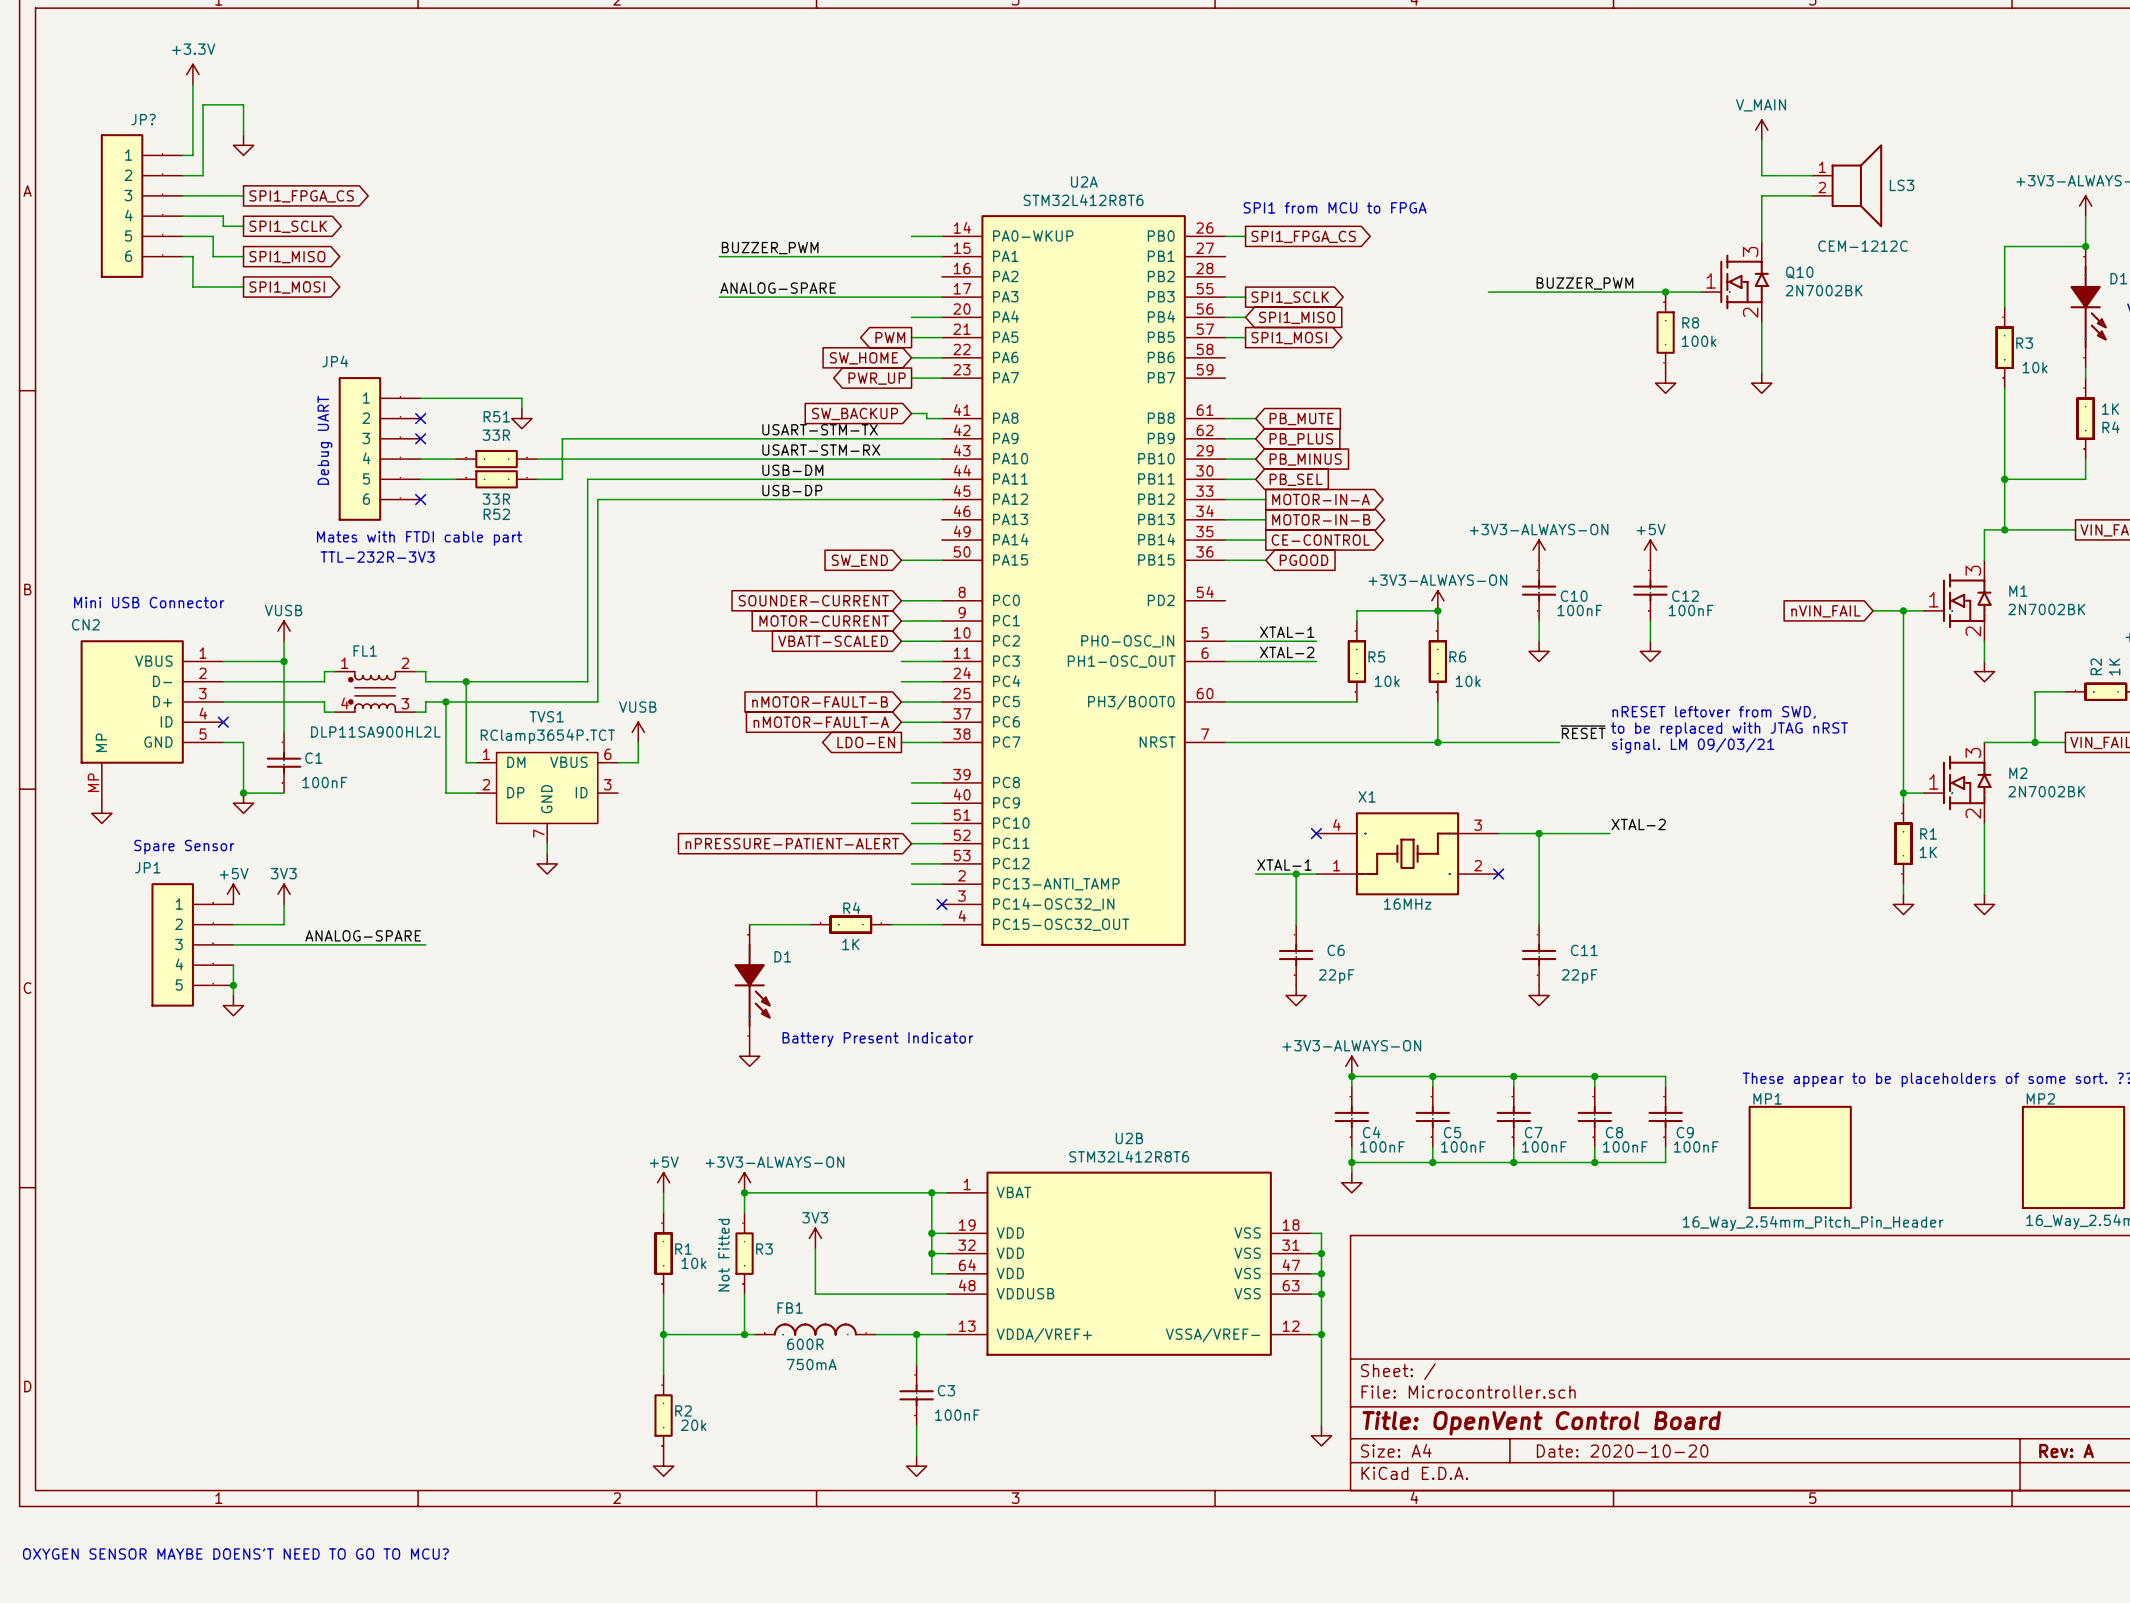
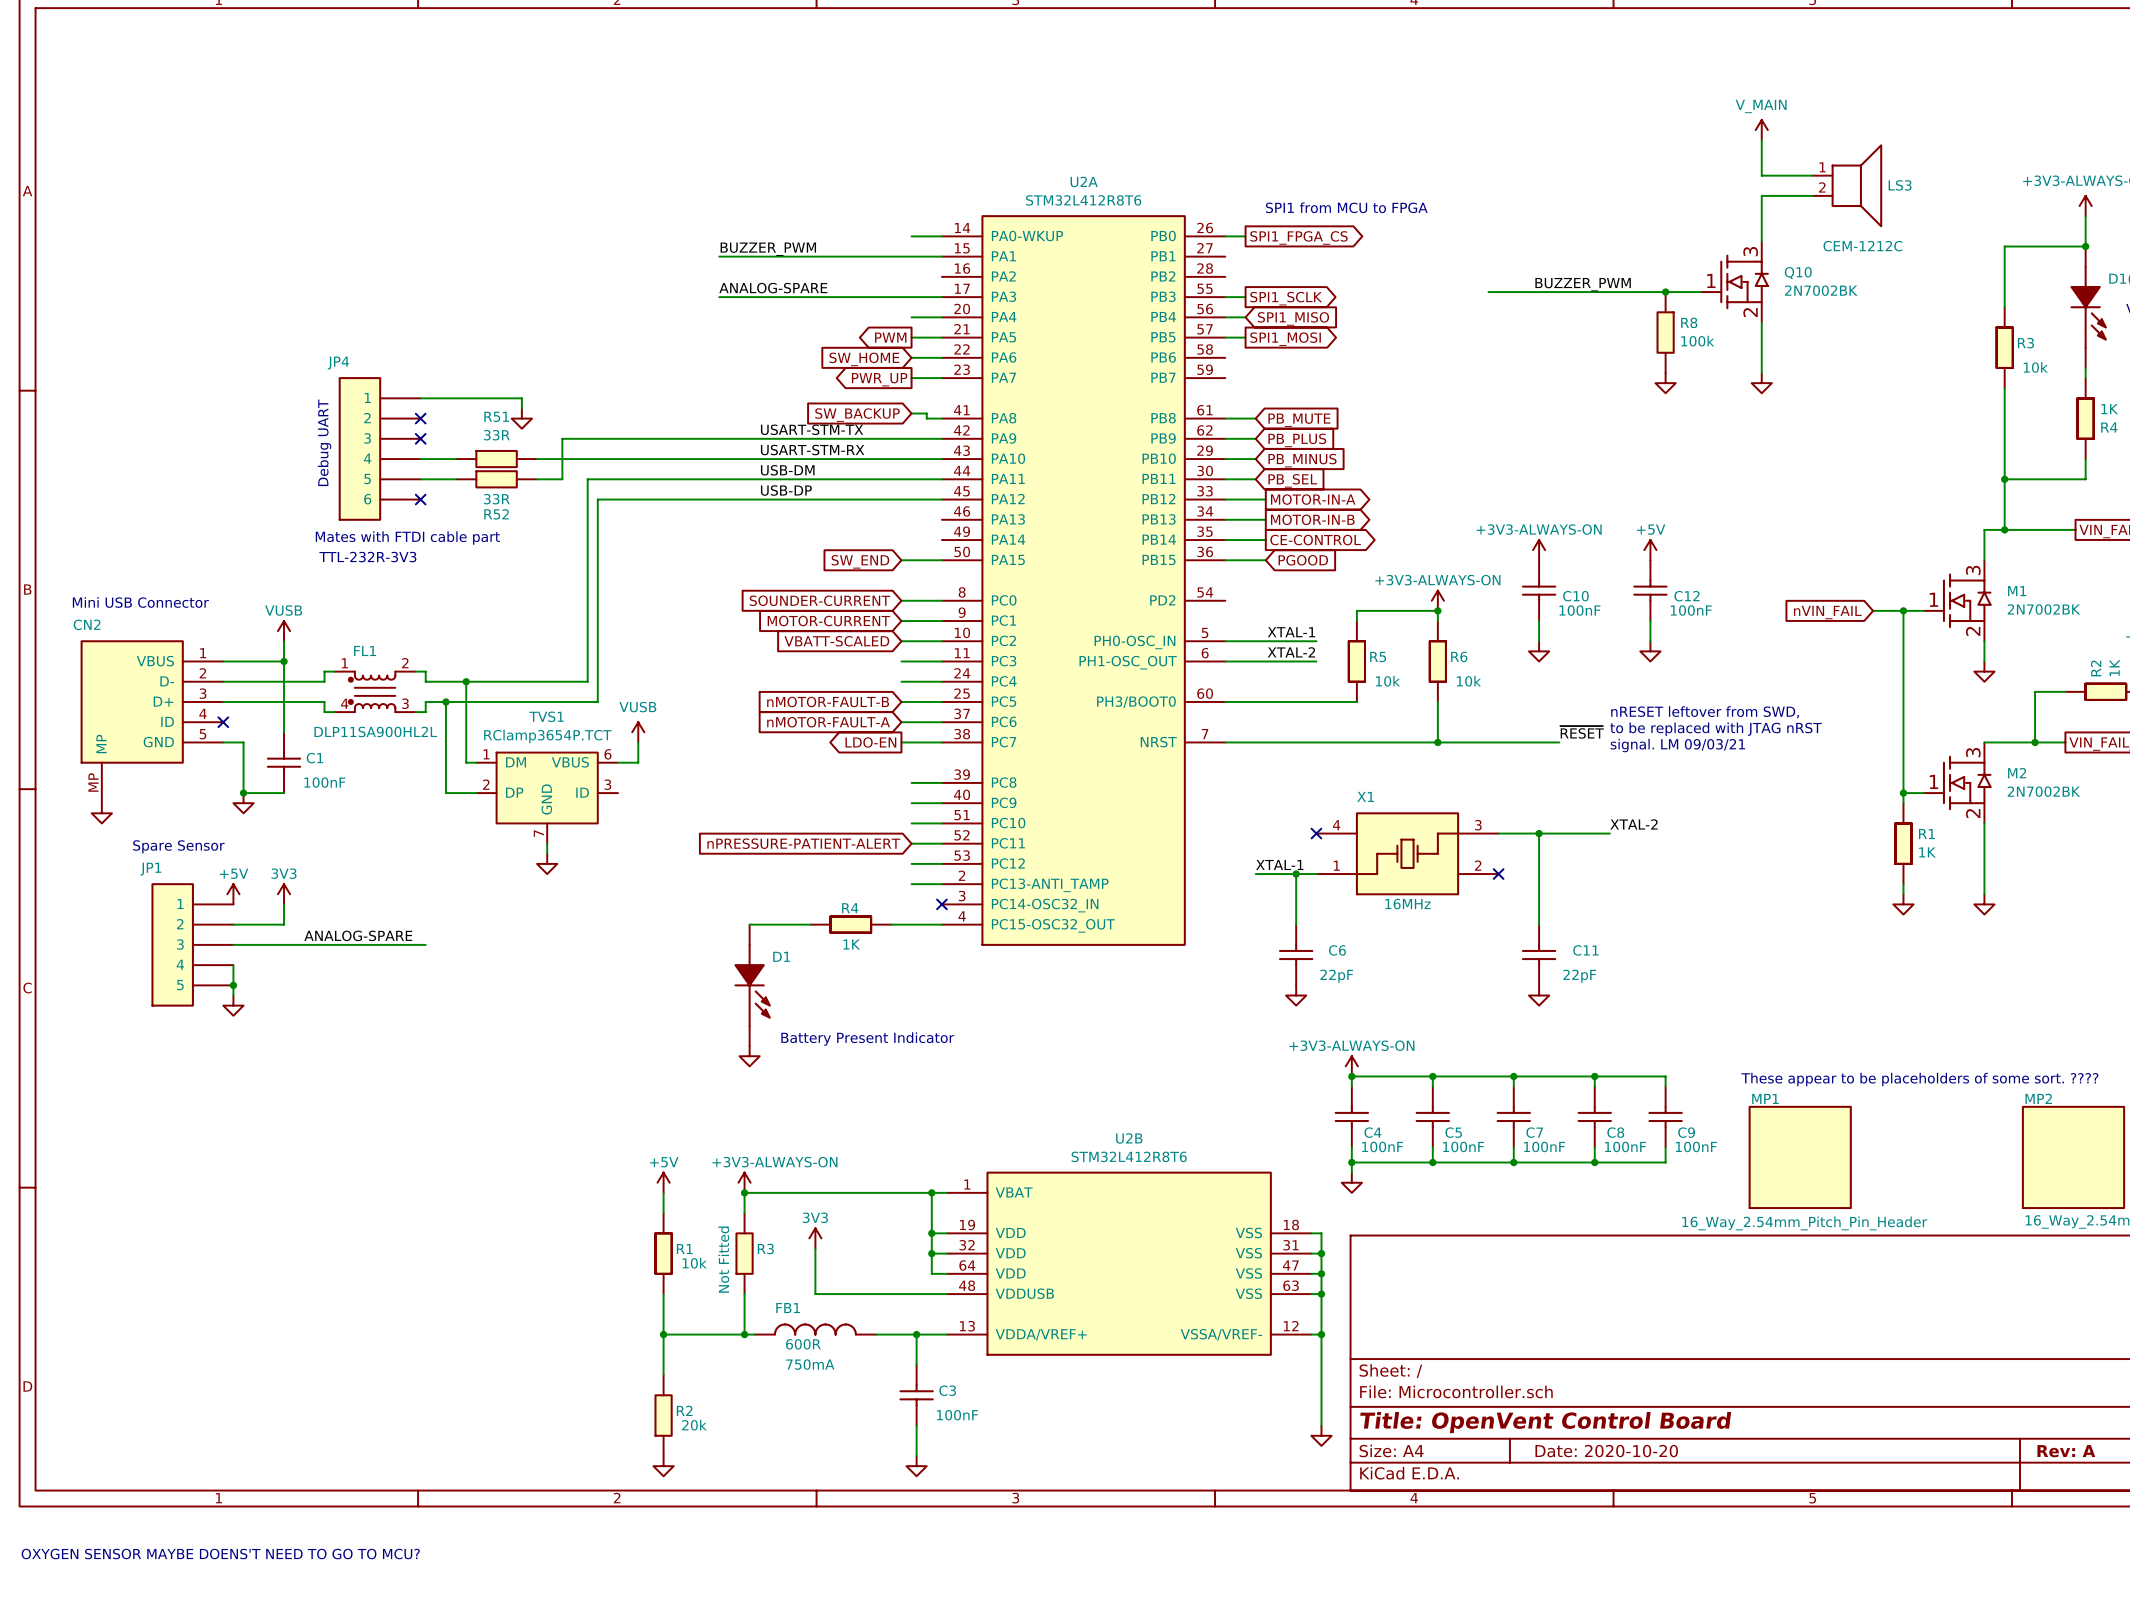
power symbol: +3.3V (192, 74) -> none
wire: (192, 84) (192, 155) (182, 155) -> none
wire: (243, 135) (243, 104) (203, 104) (203, 175) (182, 175) -> none
power symbol: (243, 145) -> none
wire: (182, 195) (243, 195) -> none
global label: SPI1_FPGA_CS (301, 196) -> none
JP?: (141, 206) -> none
wire: (182, 216) (223, 216) (223, 226) (243, 226) -> none
global label: SPI1_SCLK (288, 226) -> none
wire: (182, 236) (213, 236) (213, 256) (243, 256) -> none
wire: (182, 256) (192, 256) (192, 287) (243, 287) -> none
global label: SPI1_MISO (287, 257) -> none
global label: SPI1_MOSI (287, 287) -> none

